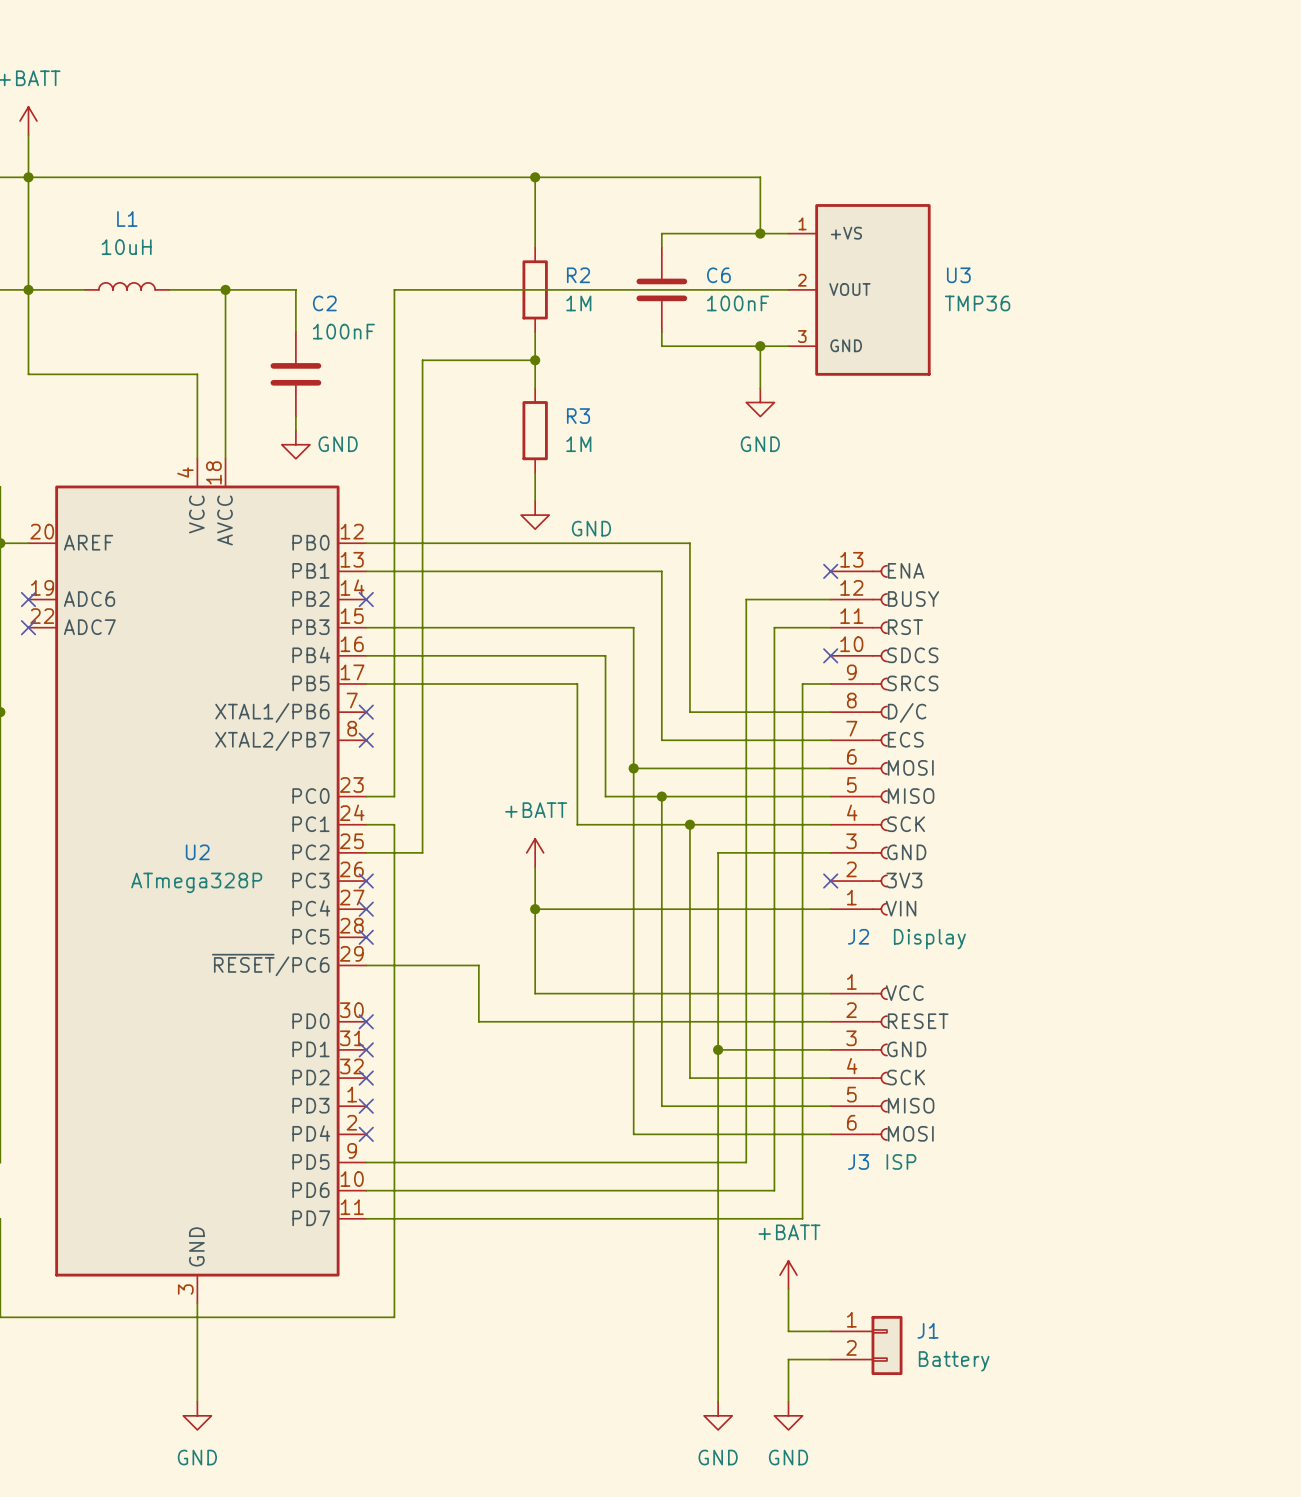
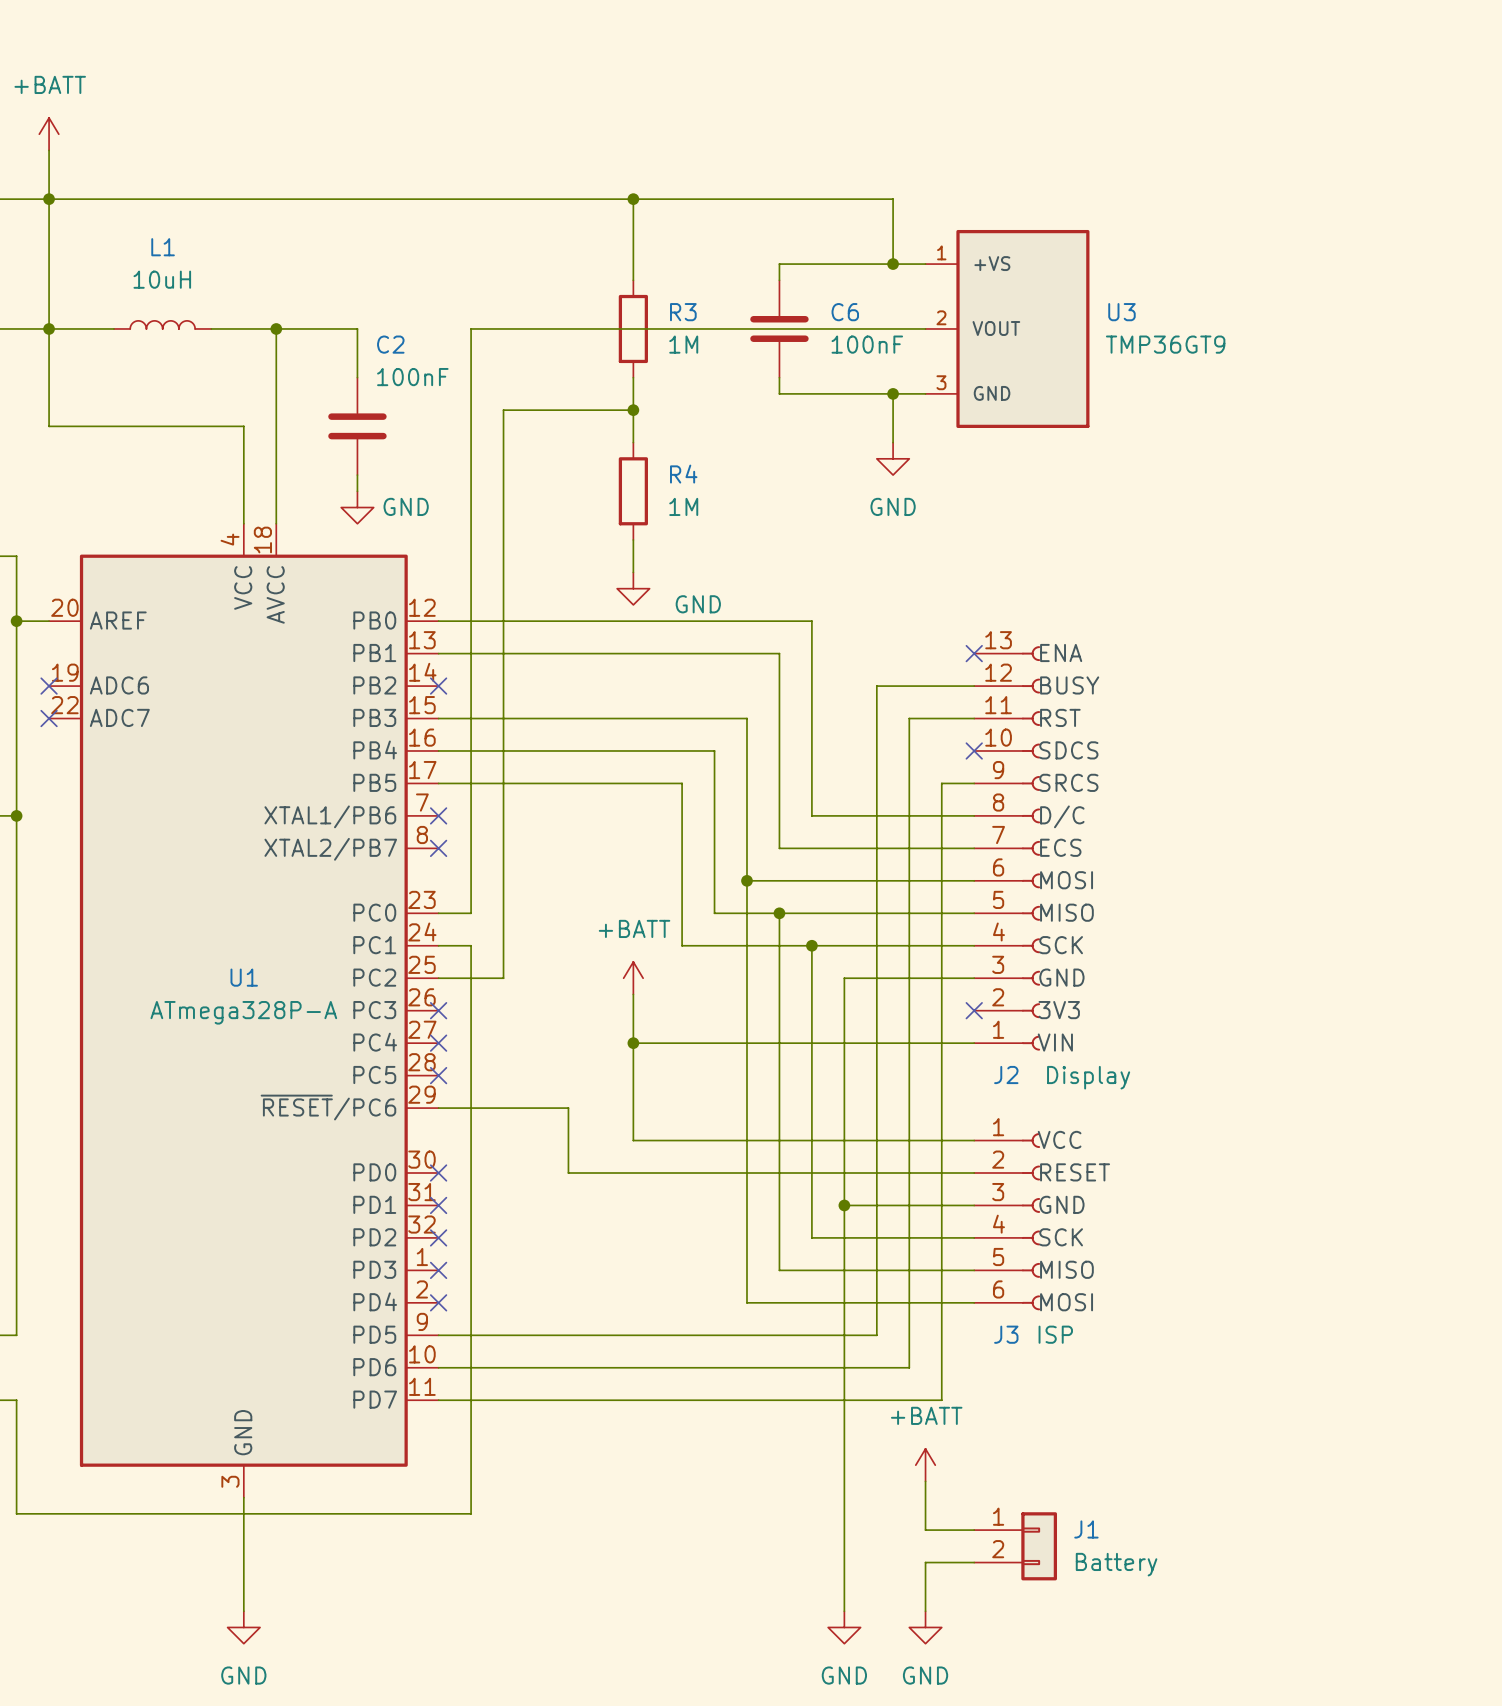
R2 name: R2 (578, 275) -> R3 (683, 312)
U3 value: TMP36 (977, 303) -> TMP36GT9 (1165, 344)
R3 name: R3 (578, 416) -> R4 (683, 474)
U2 name: U2 (197, 852) -> U1 (244, 977)
U2 value: ATmega328P (196, 882) -> ATmega328P-A (243, 1012)

